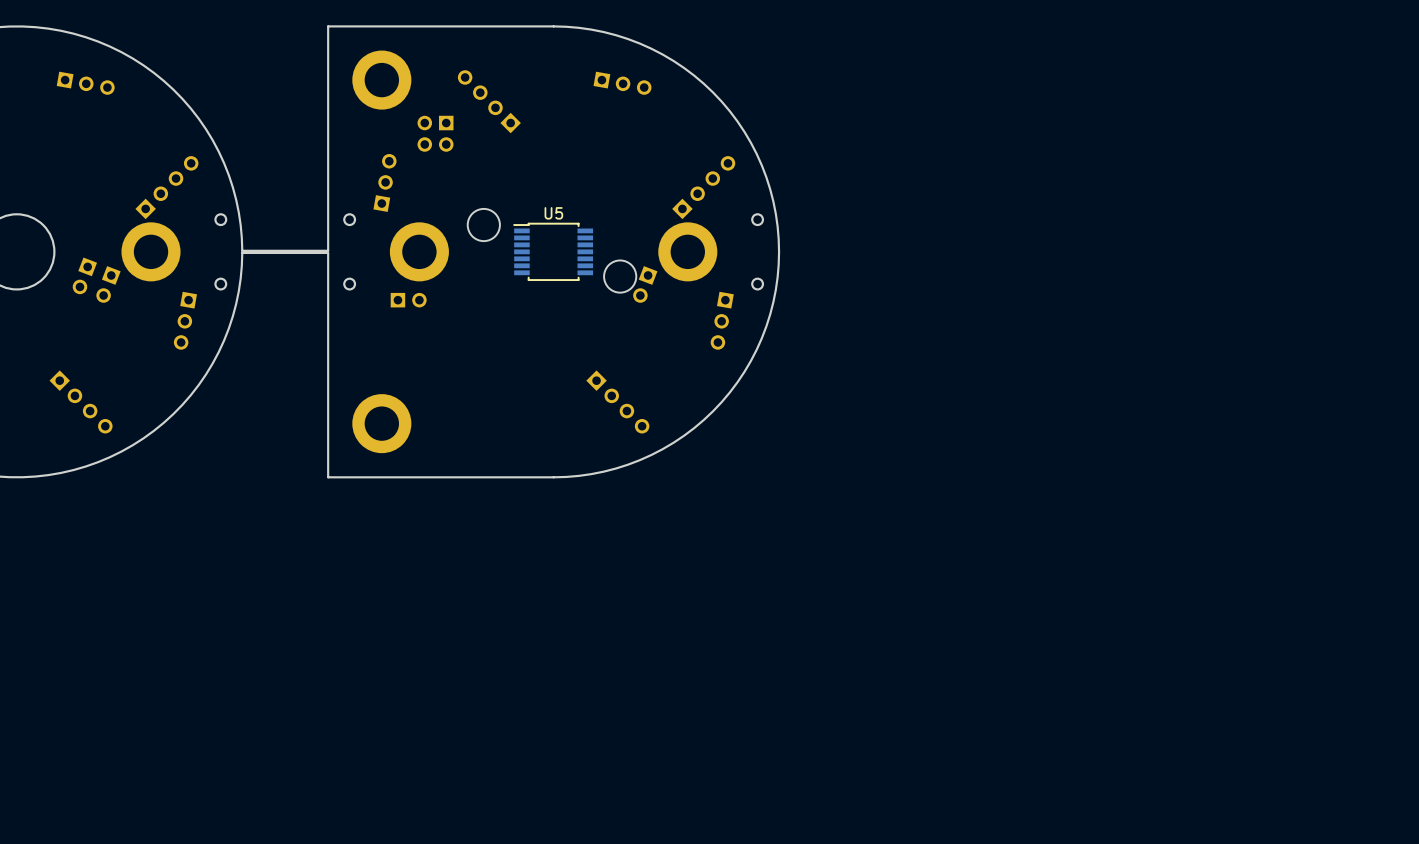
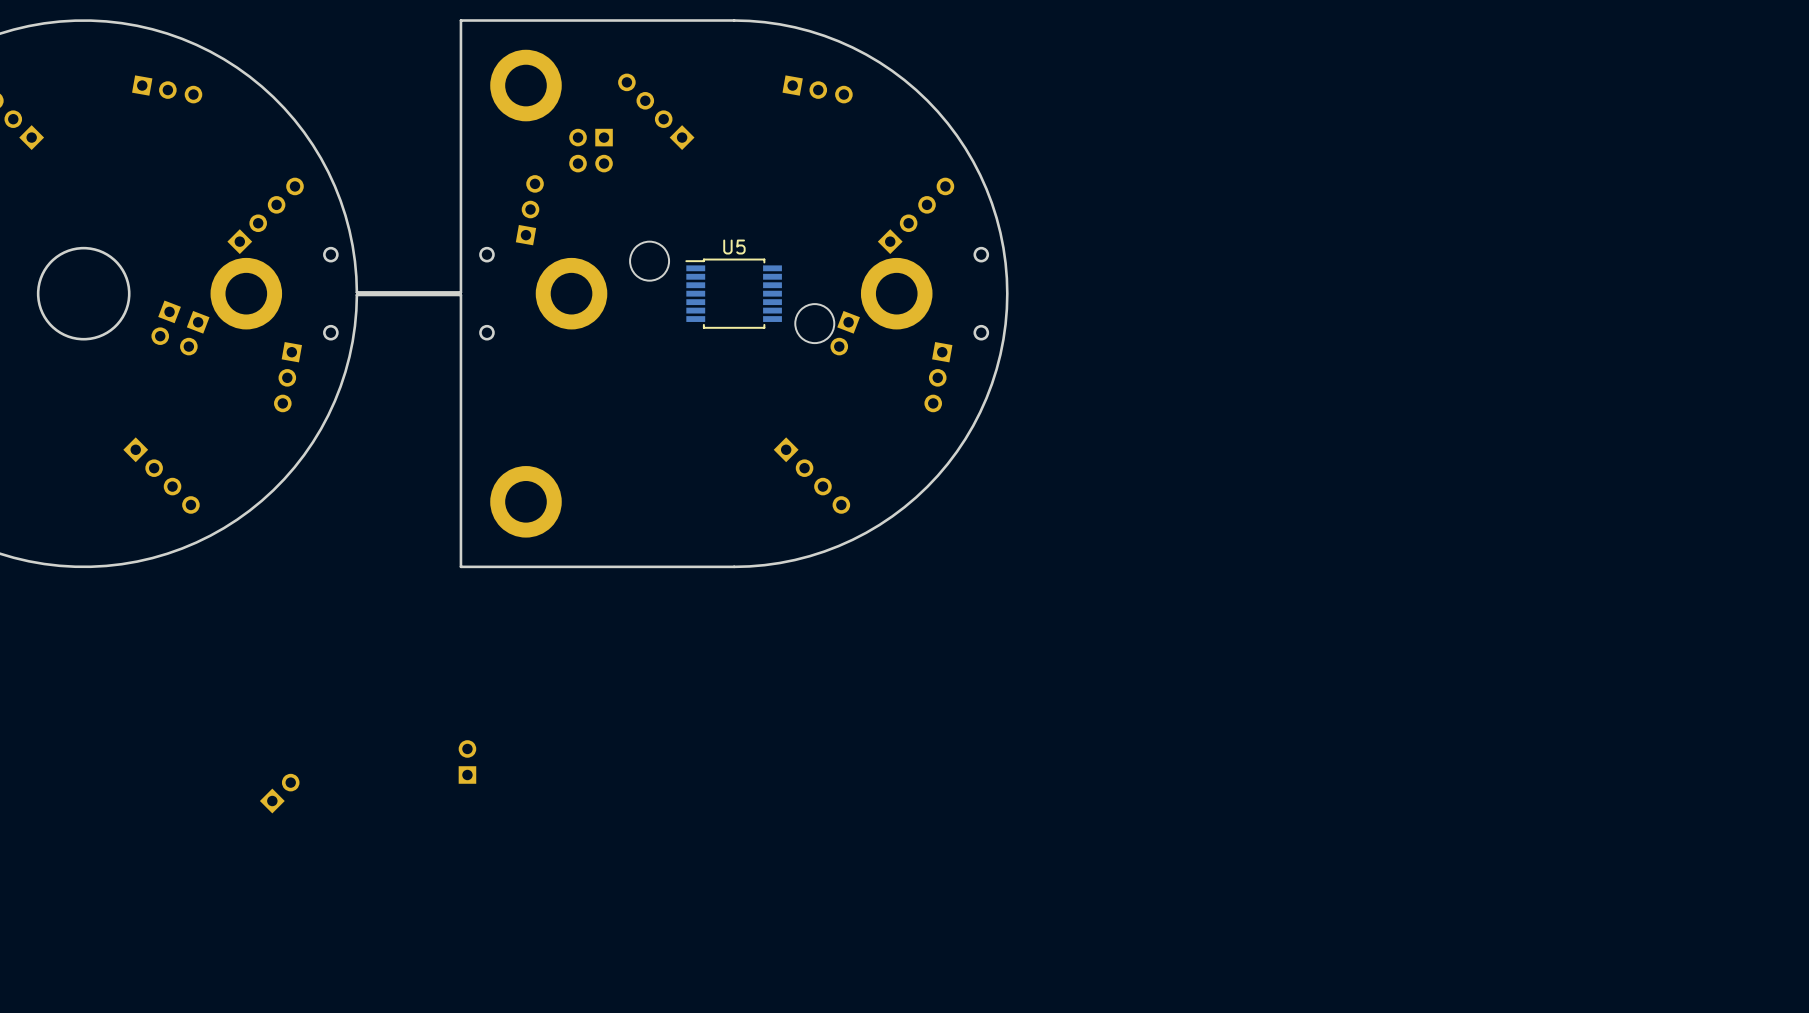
part: (408, 300) -> none
part: none -> (467, 761)
part: none -> (279, 793)

